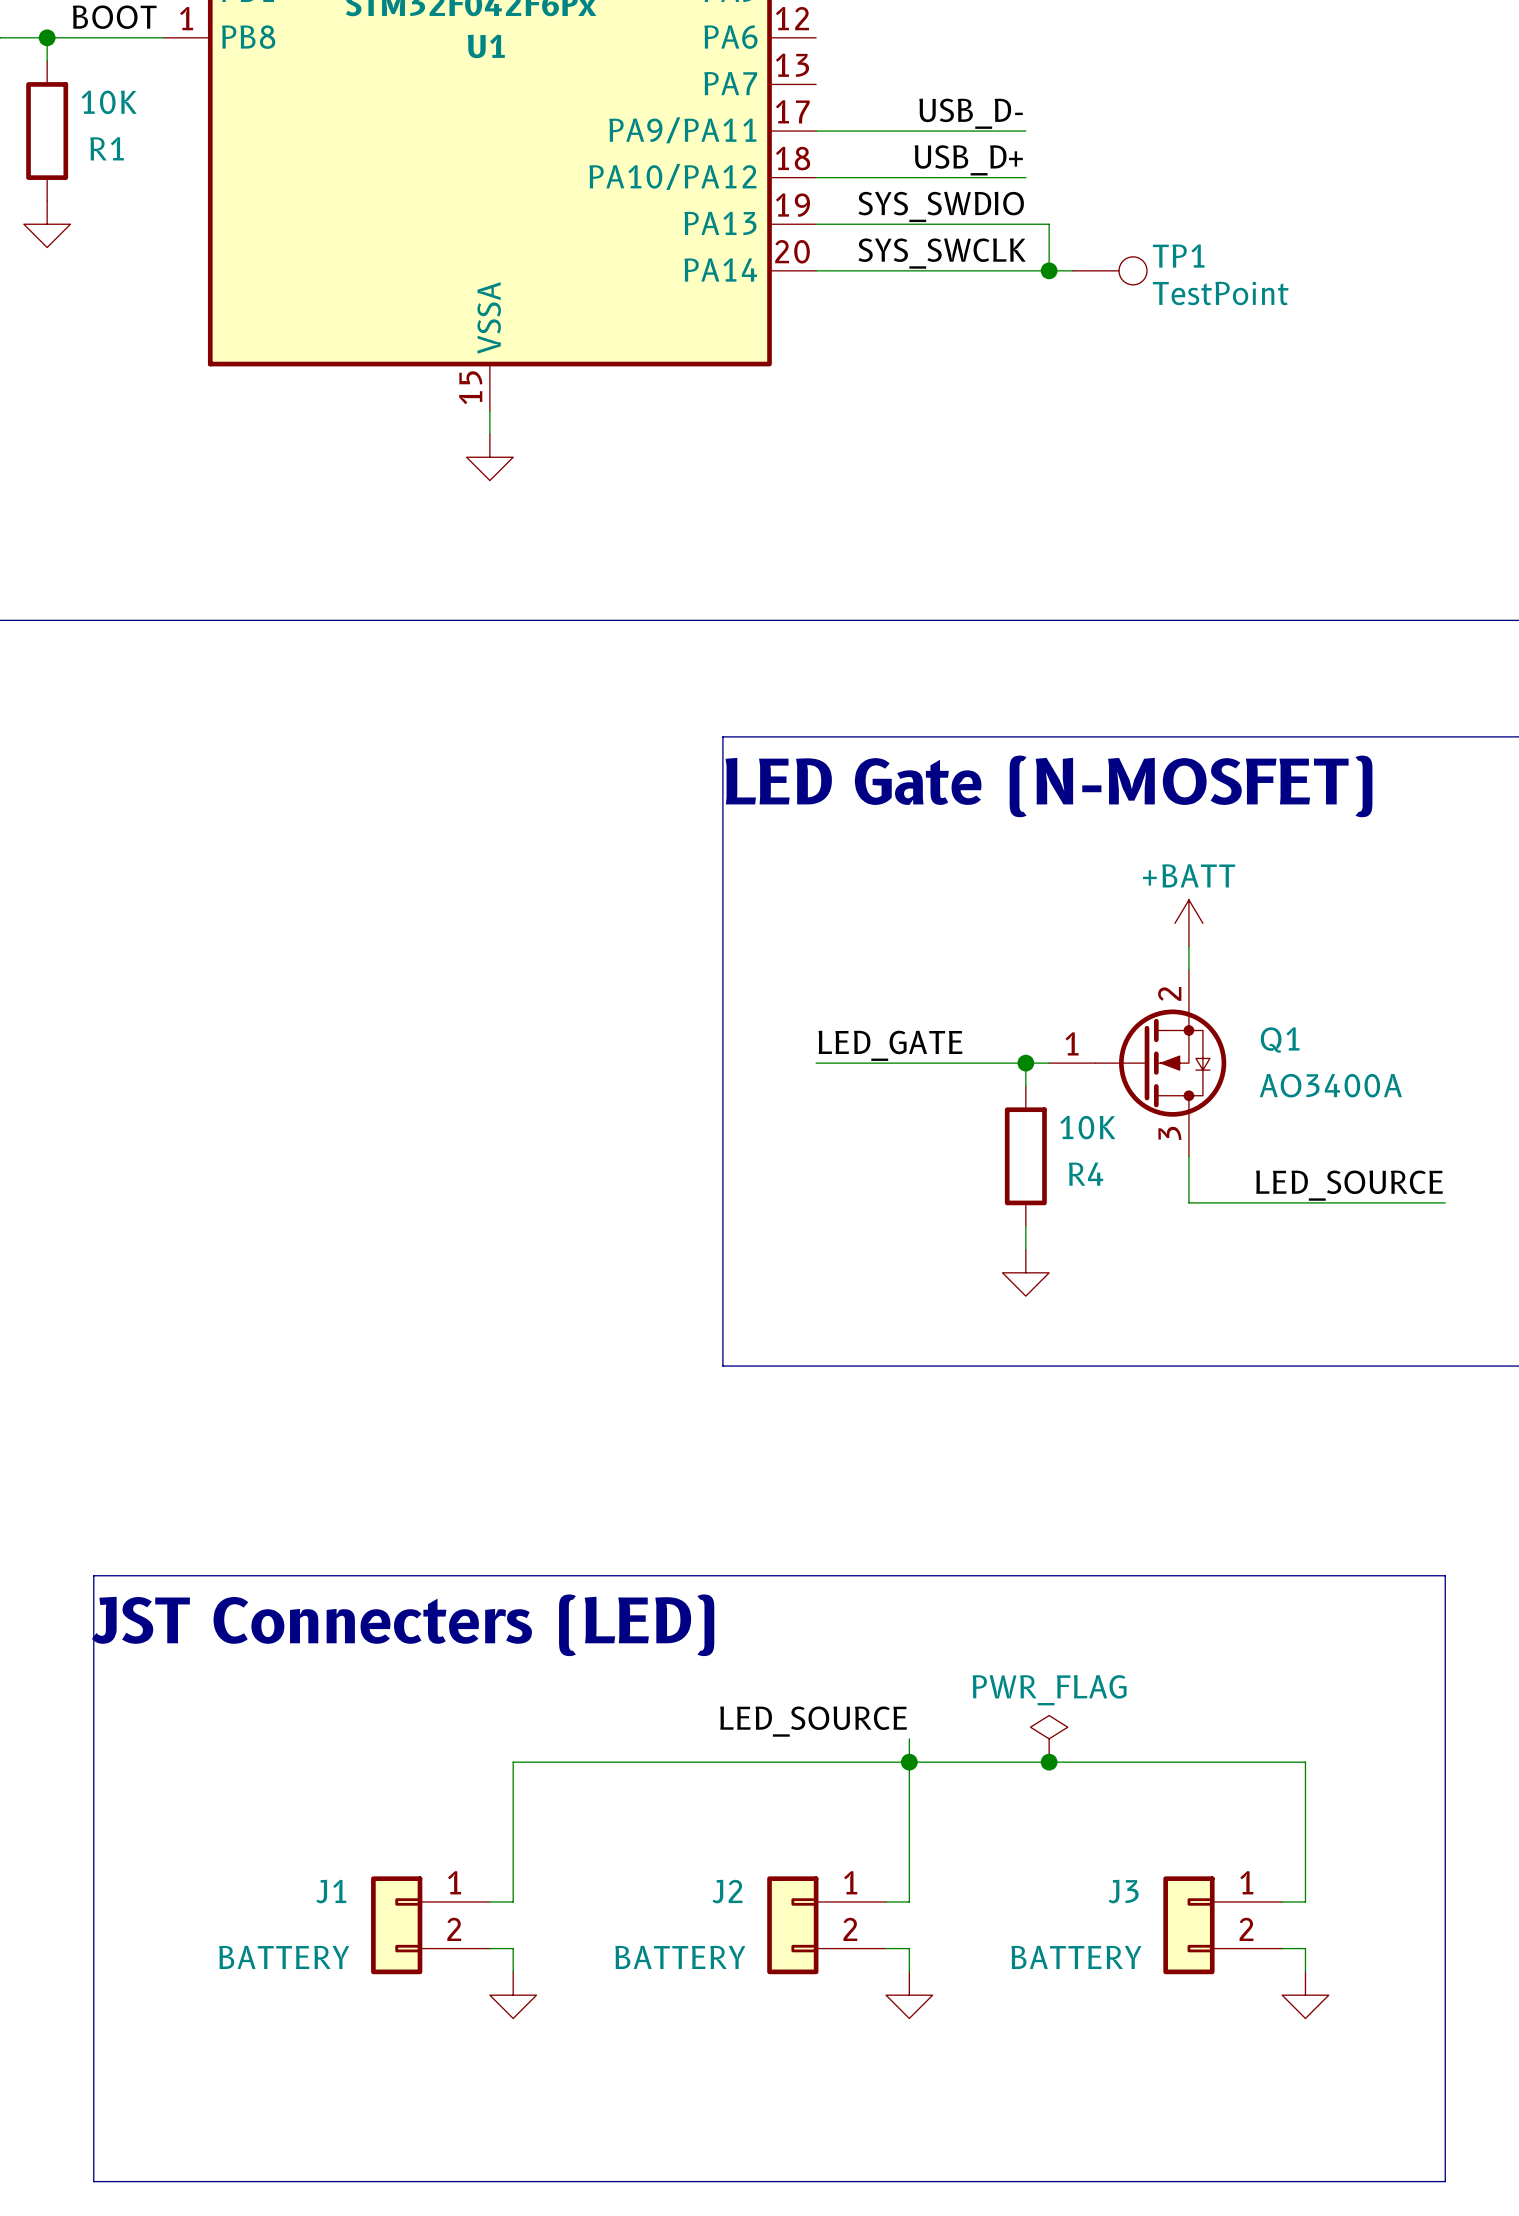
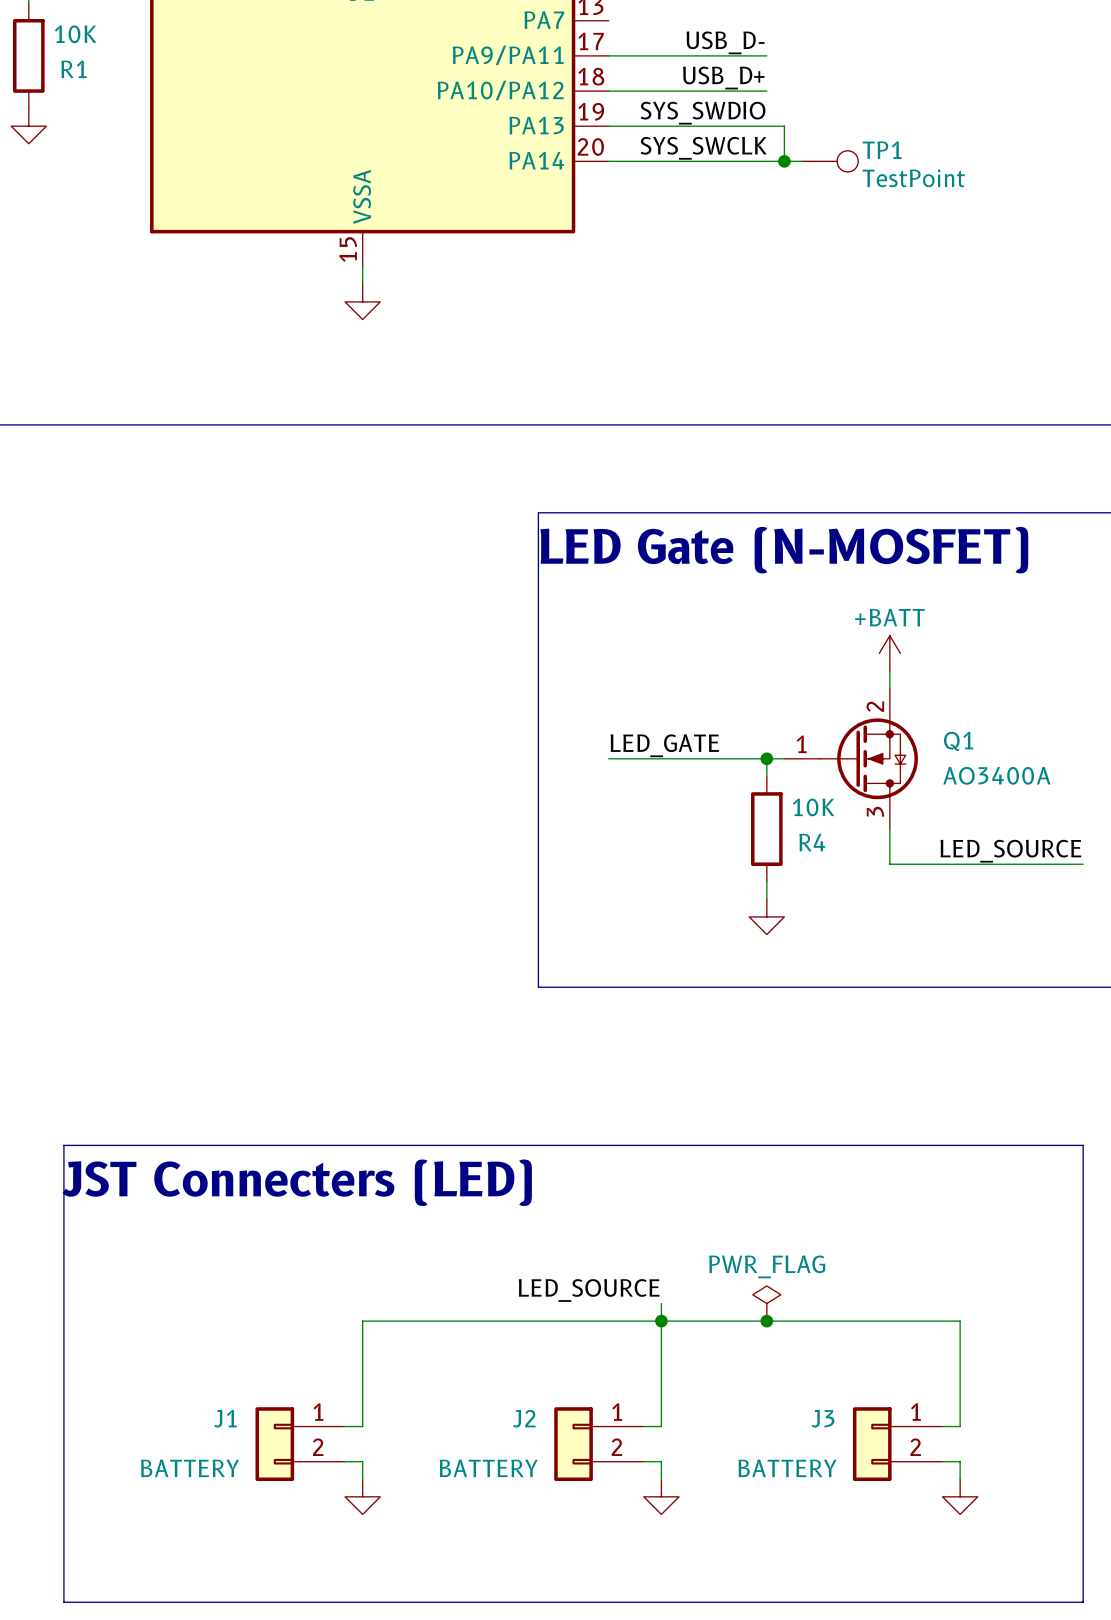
label position: LED_SOURCE (813, 1721) -> LED_SOURCE (589, 1290)
wire: (909, 1738) (909, 1901) (886, 1901) -> (661, 1303) (661, 1426) (643, 1426)
power symbol position: PWR_FLAG (1049, 1738) -> PWR_FLAG (766, 1303)
junction position: (909, 1762) -> (661, 1321)
junction position: (1049, 1762) -> (766, 1321)
wire: (489, 1901) (513, 1901) (513, 1762) (1305, 1762) (1305, 1901) (1282, 1901) -> (345, 1426) (362, 1426) (362, 1321) (960, 1321) (960, 1426) (942, 1426)
J1 position: (430, 1925) -> (300, 1444)
J2 position: (826, 1925) -> (599, 1444)
J3 position: (1222, 1925) -> (897, 1444)
wire: (489, 1948) (513, 1948) (513, 1971) -> (345, 1461) (362, 1461) (362, 1479)
wire: (886, 1948) (909, 1948) (909, 1971) -> (643, 1461) (661, 1461) (661, 1479)
wire: (1282, 1948) (1305, 1948) (1305, 1971) -> (942, 1461) (960, 1461) (960, 1479)
power symbol position: (513, 1995) -> (362, 1496)
power symbol position: (909, 1995) -> (661, 1496)
power symbol position: (1305, 1995) -> (960, 1496)

